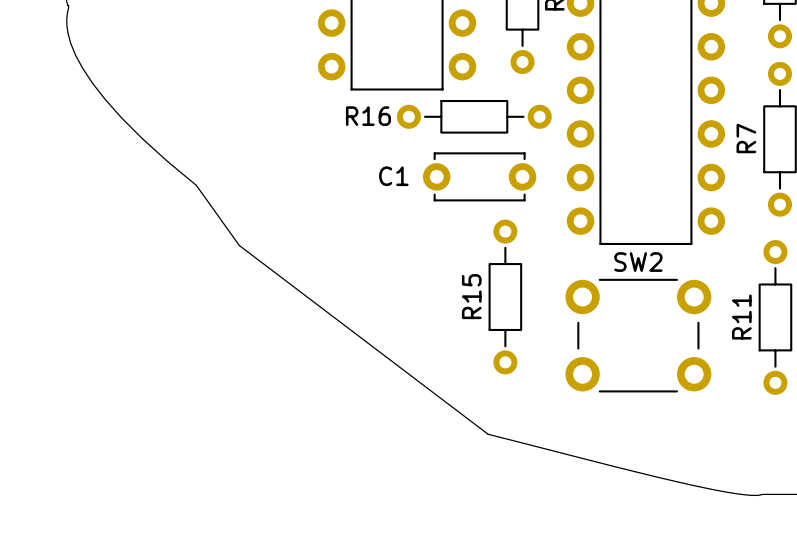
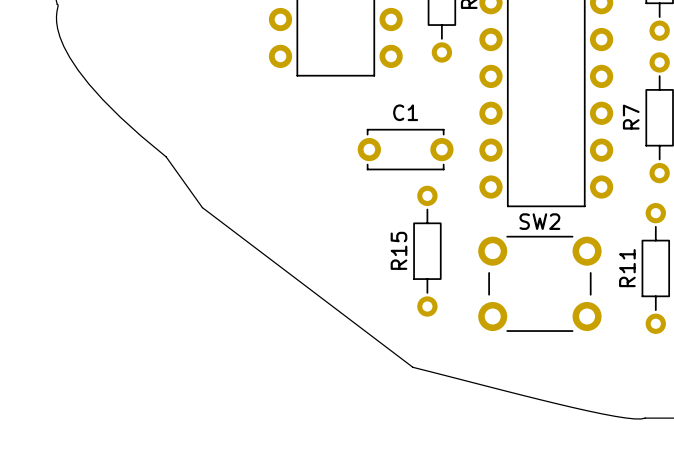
R16: (474, 116) -> none
C1 name position: C1 (393, 176) -> C1 (405, 112)

